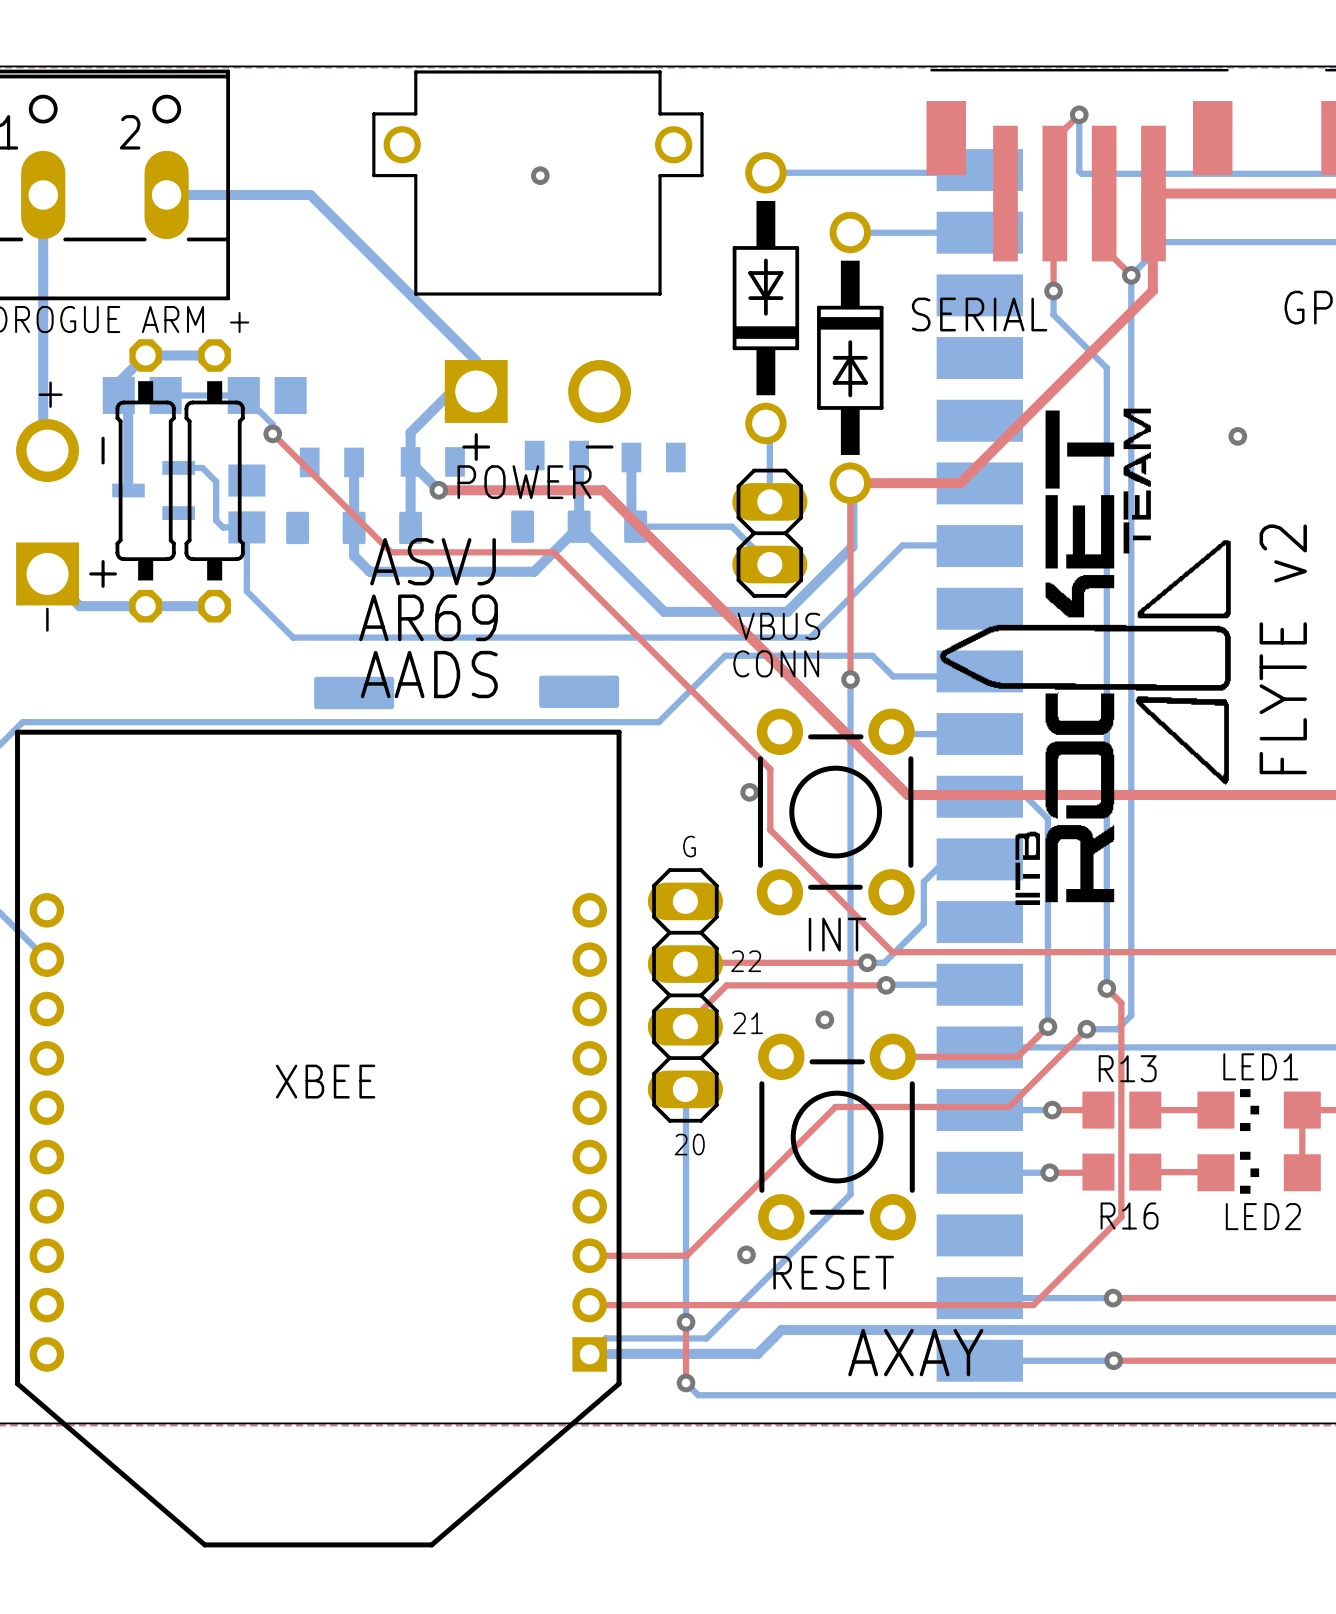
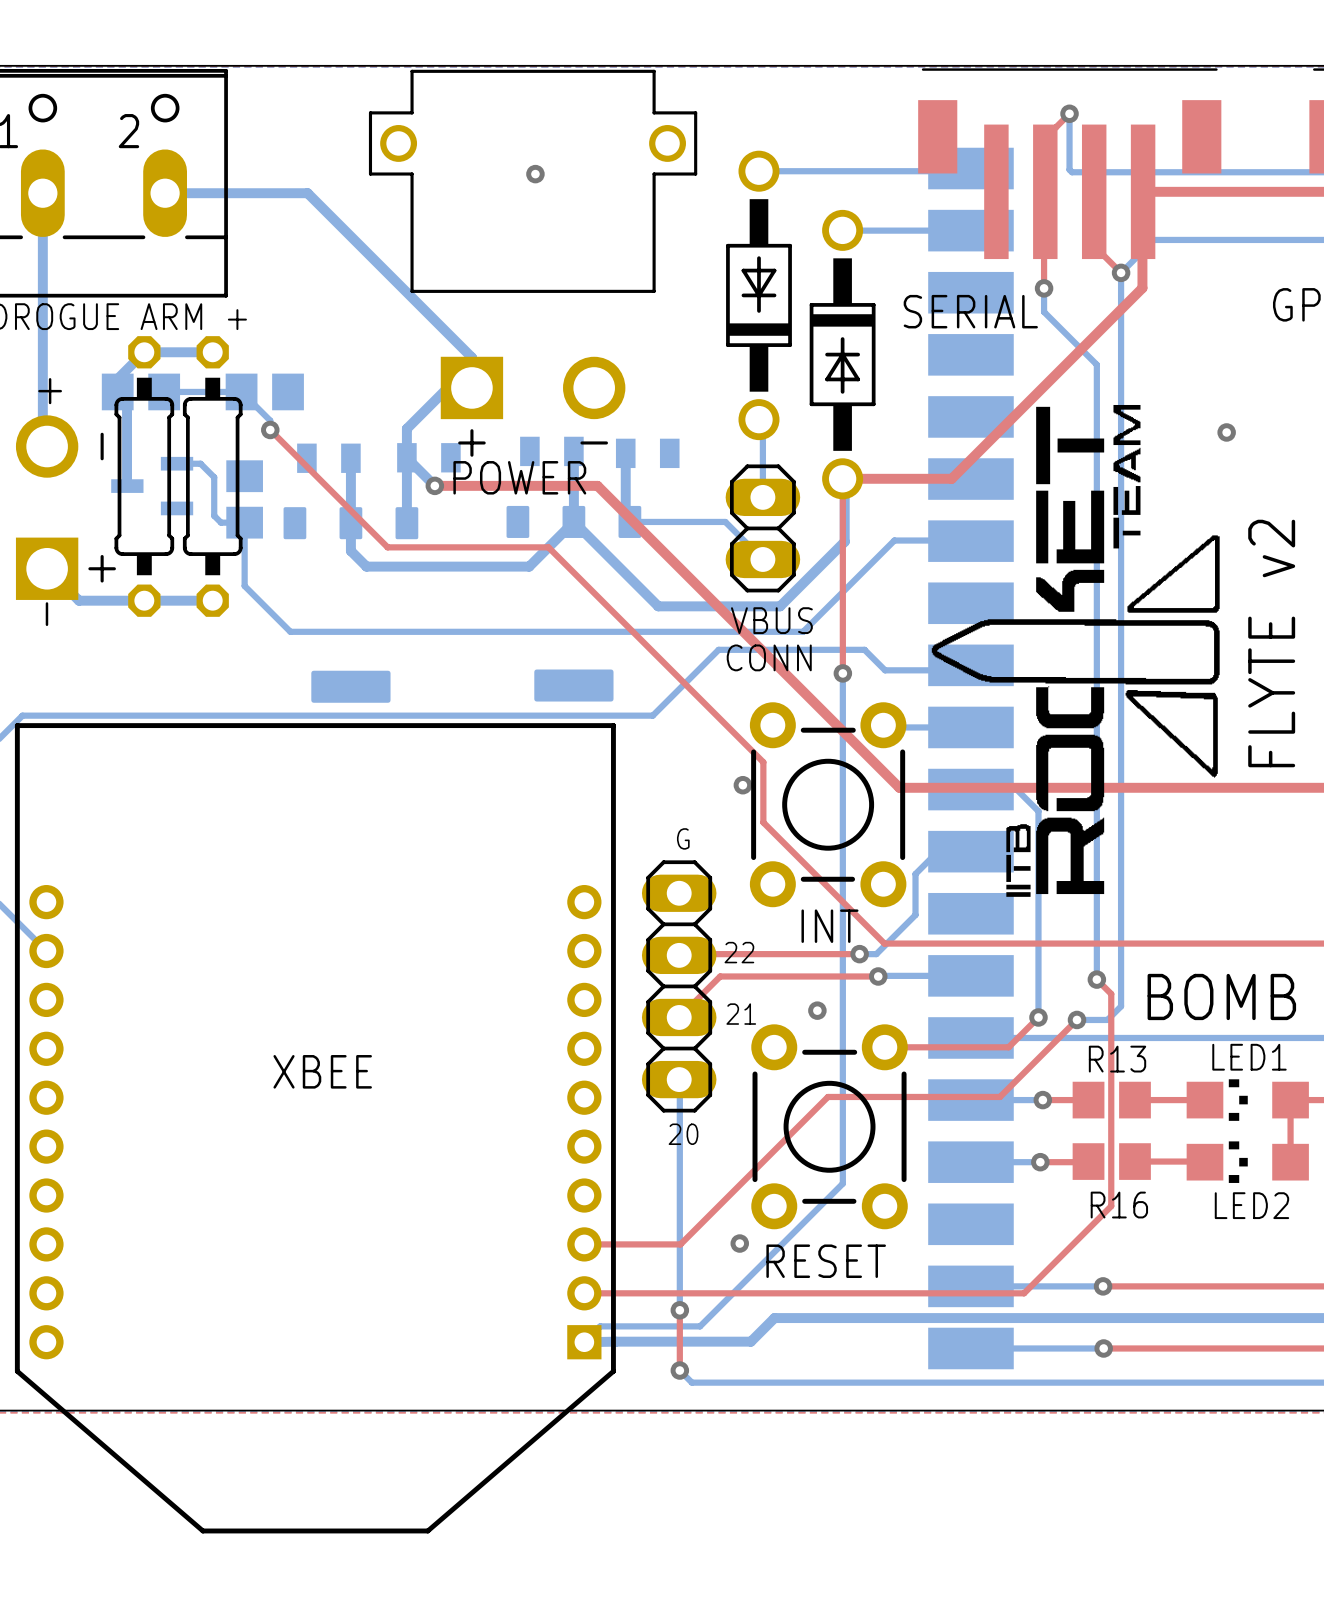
text: ASVJ (433, 561) -> none
text: AR69 (428, 617) -> none
text: AADS (429, 674) -> none
text: none -> BOMB (1221, 996)
text: AXAY (915, 1352) -> none

